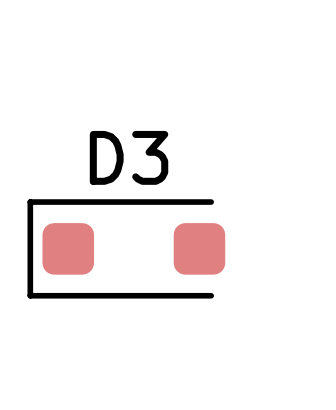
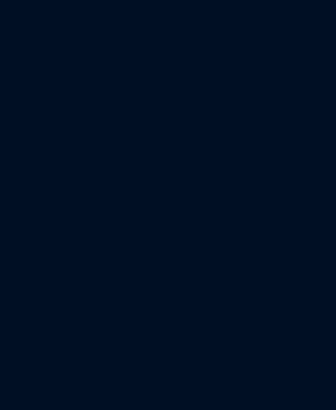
D3: (126, 248) -> none

